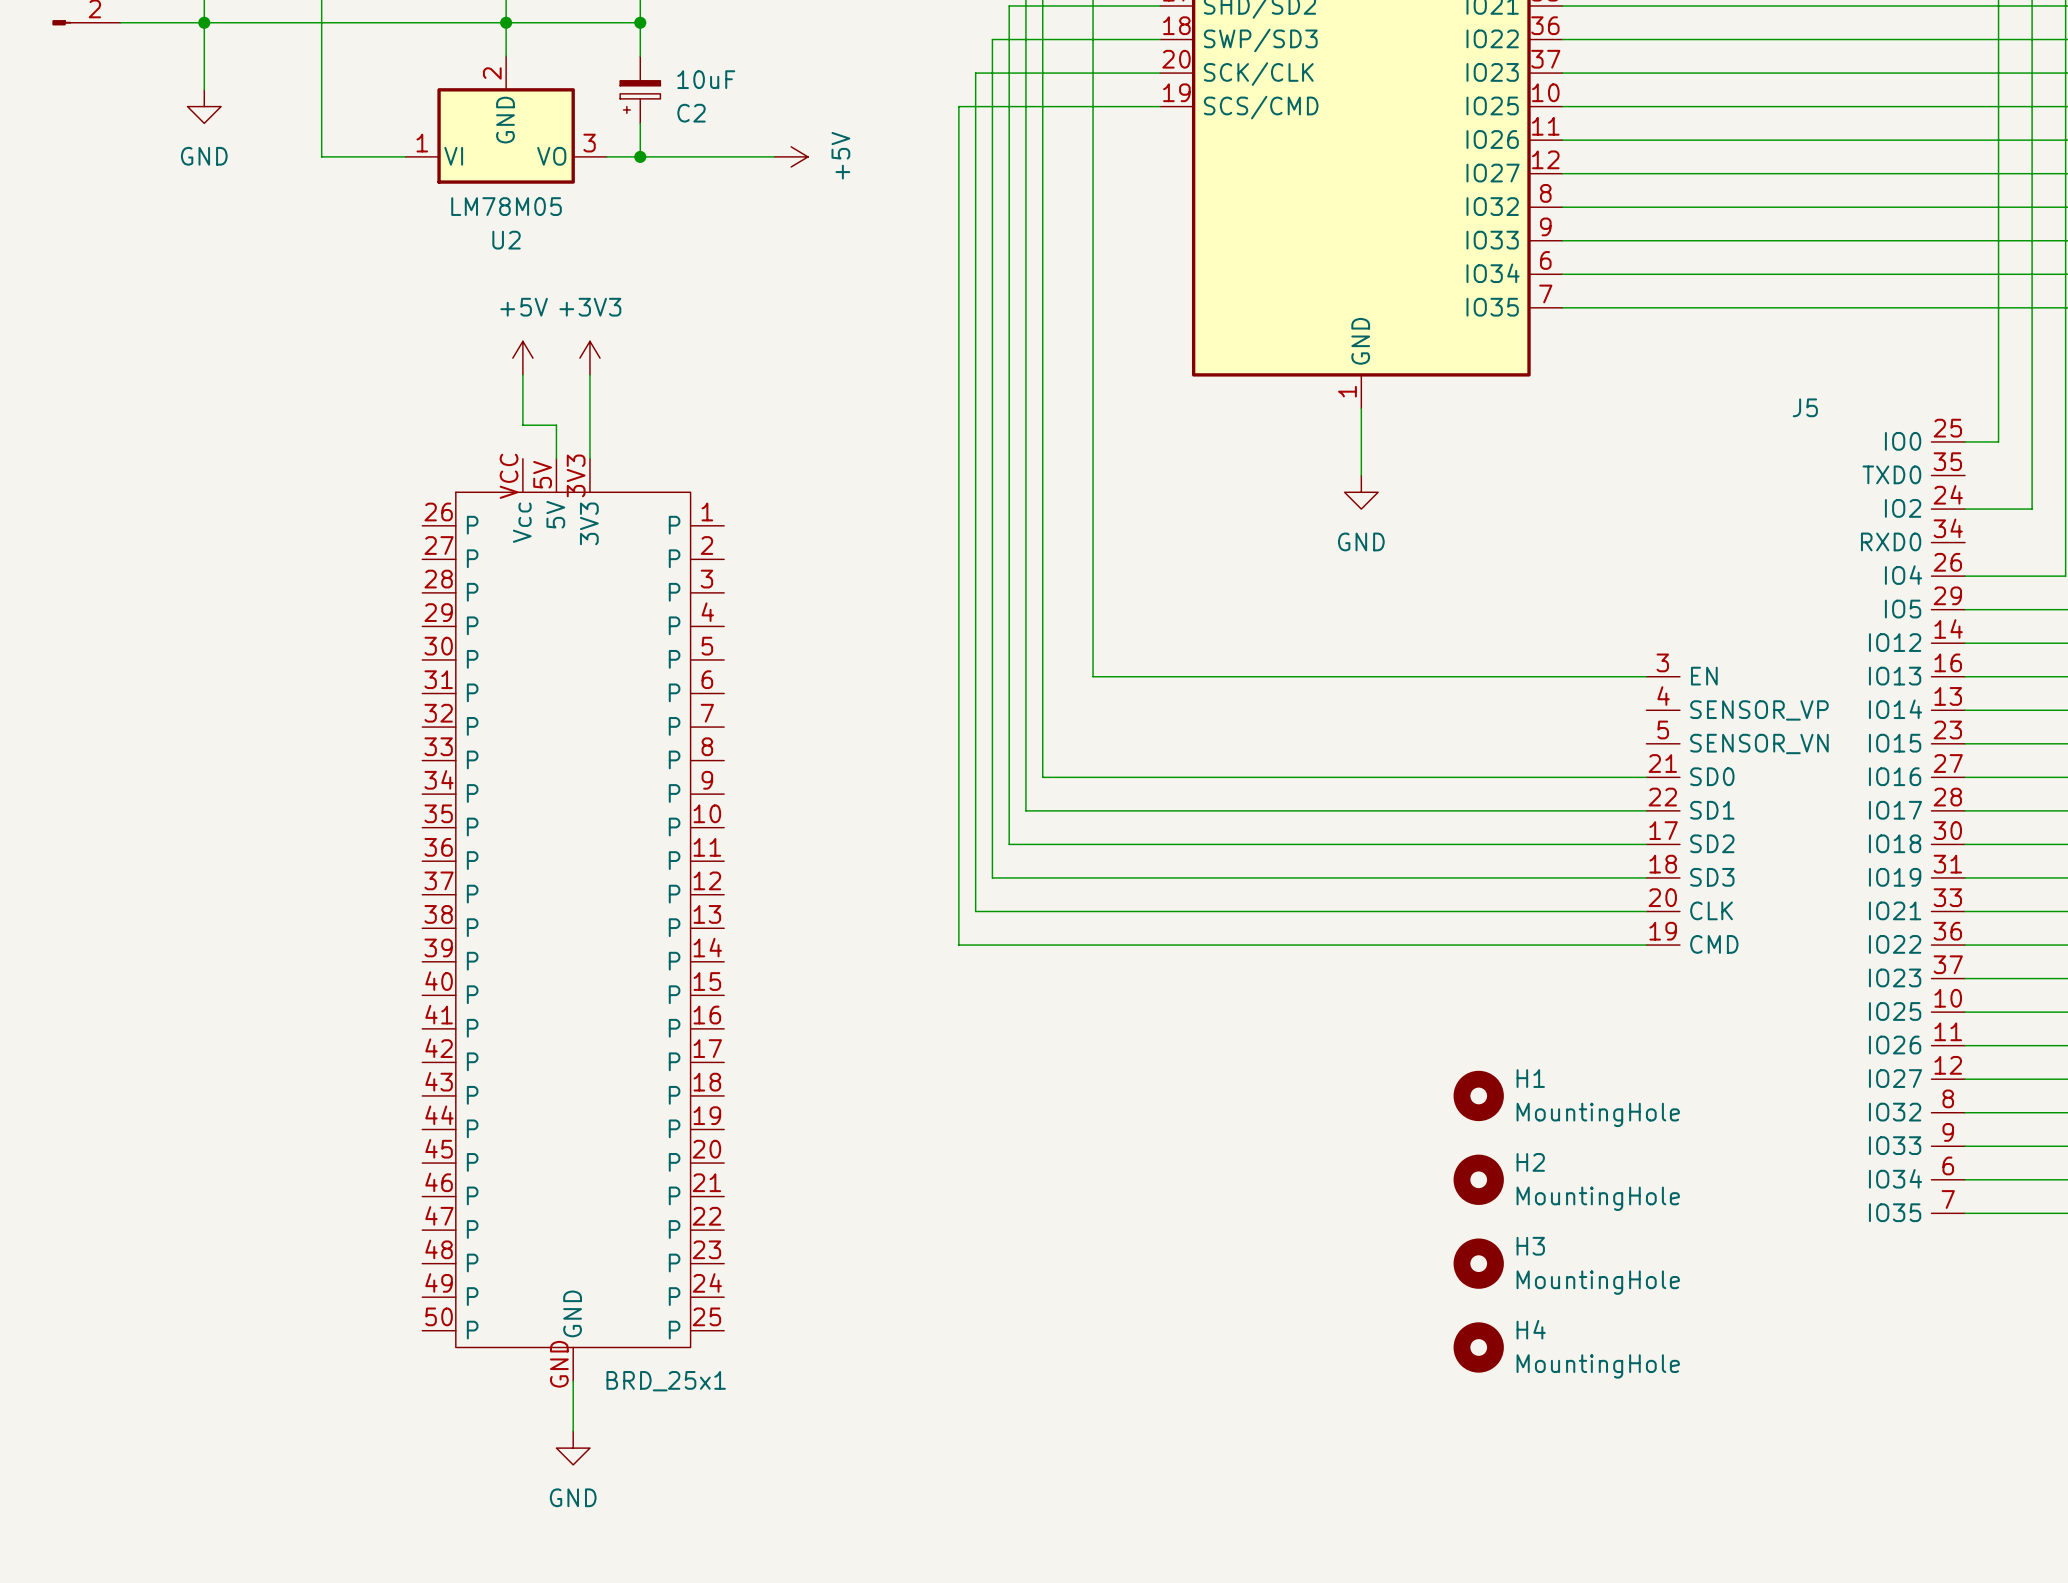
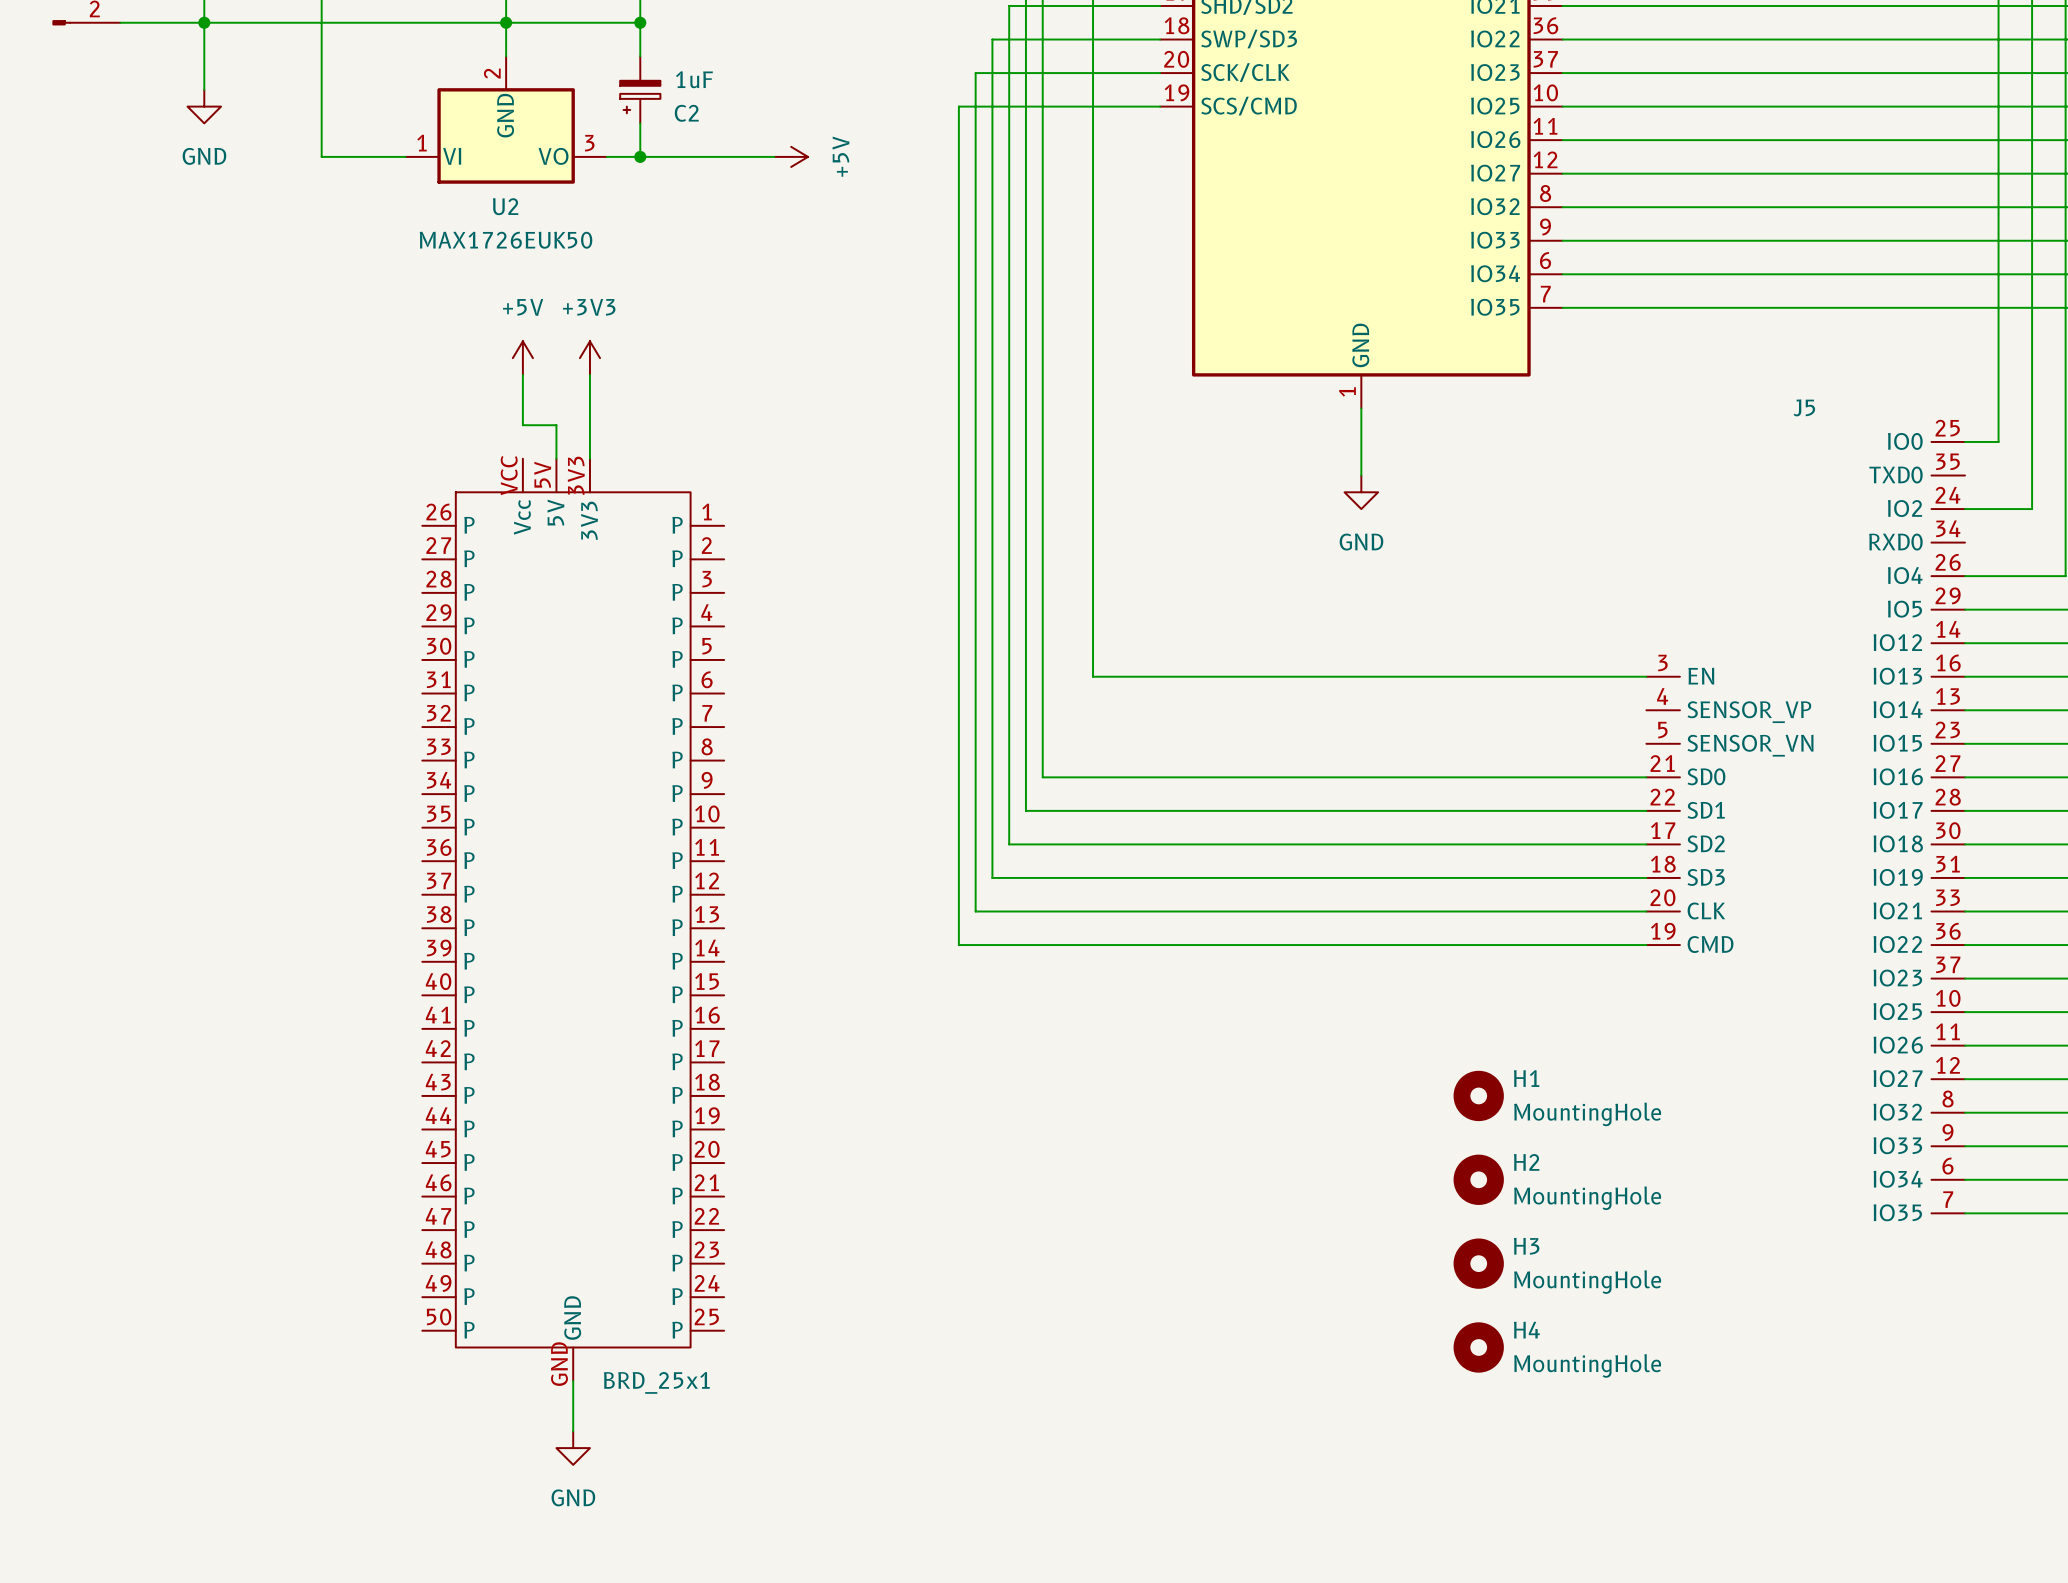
C2 value: 10uF (706, 79) -> 1uF (694, 79)
U2 value: LM78M05 (506, 206) -> MAX1726EUK50 (506, 240)
U2 name position: U2 (506, 240) -> U2 (505, 206)

